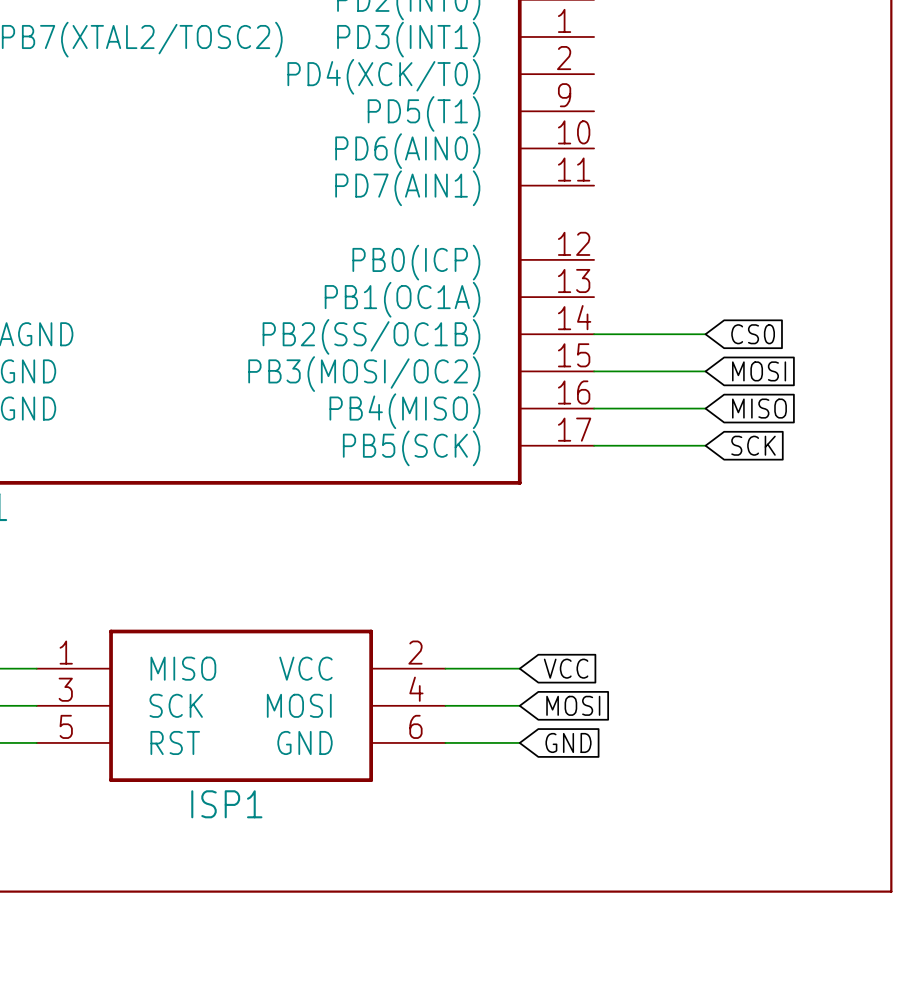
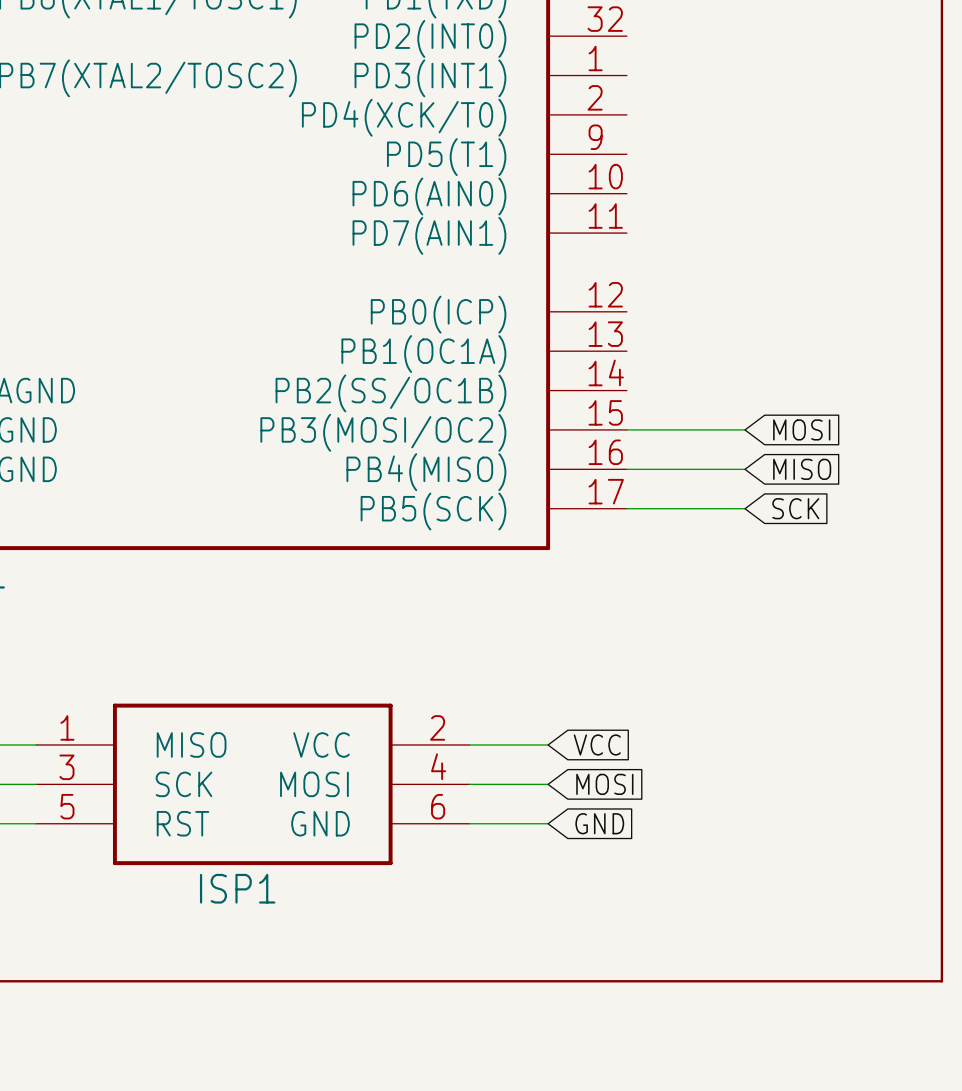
wire: (594, 334) (705, 334) -> none
global label: CS0 (753, 334) -> none

